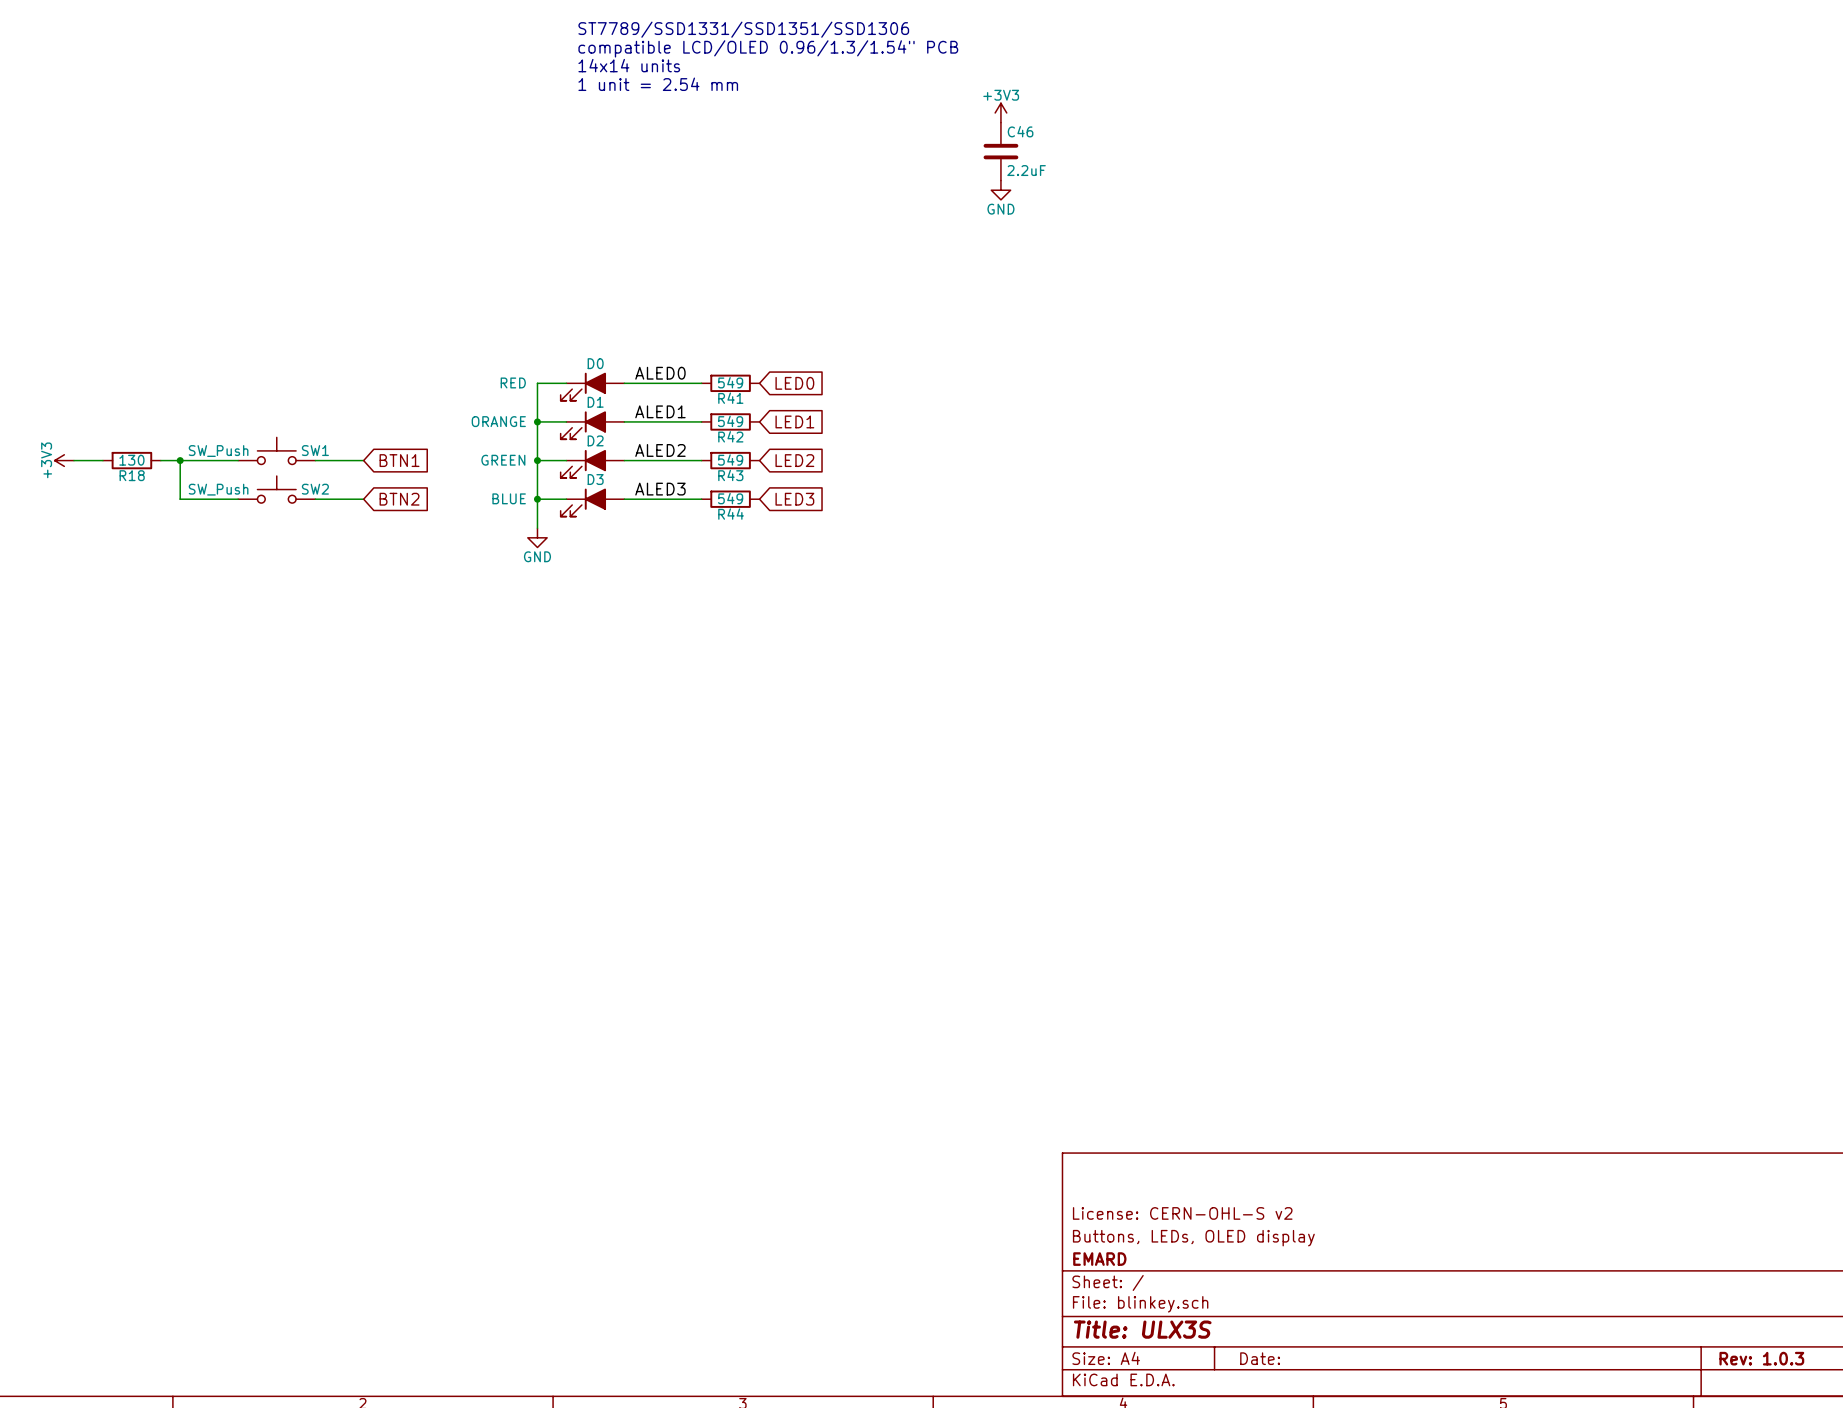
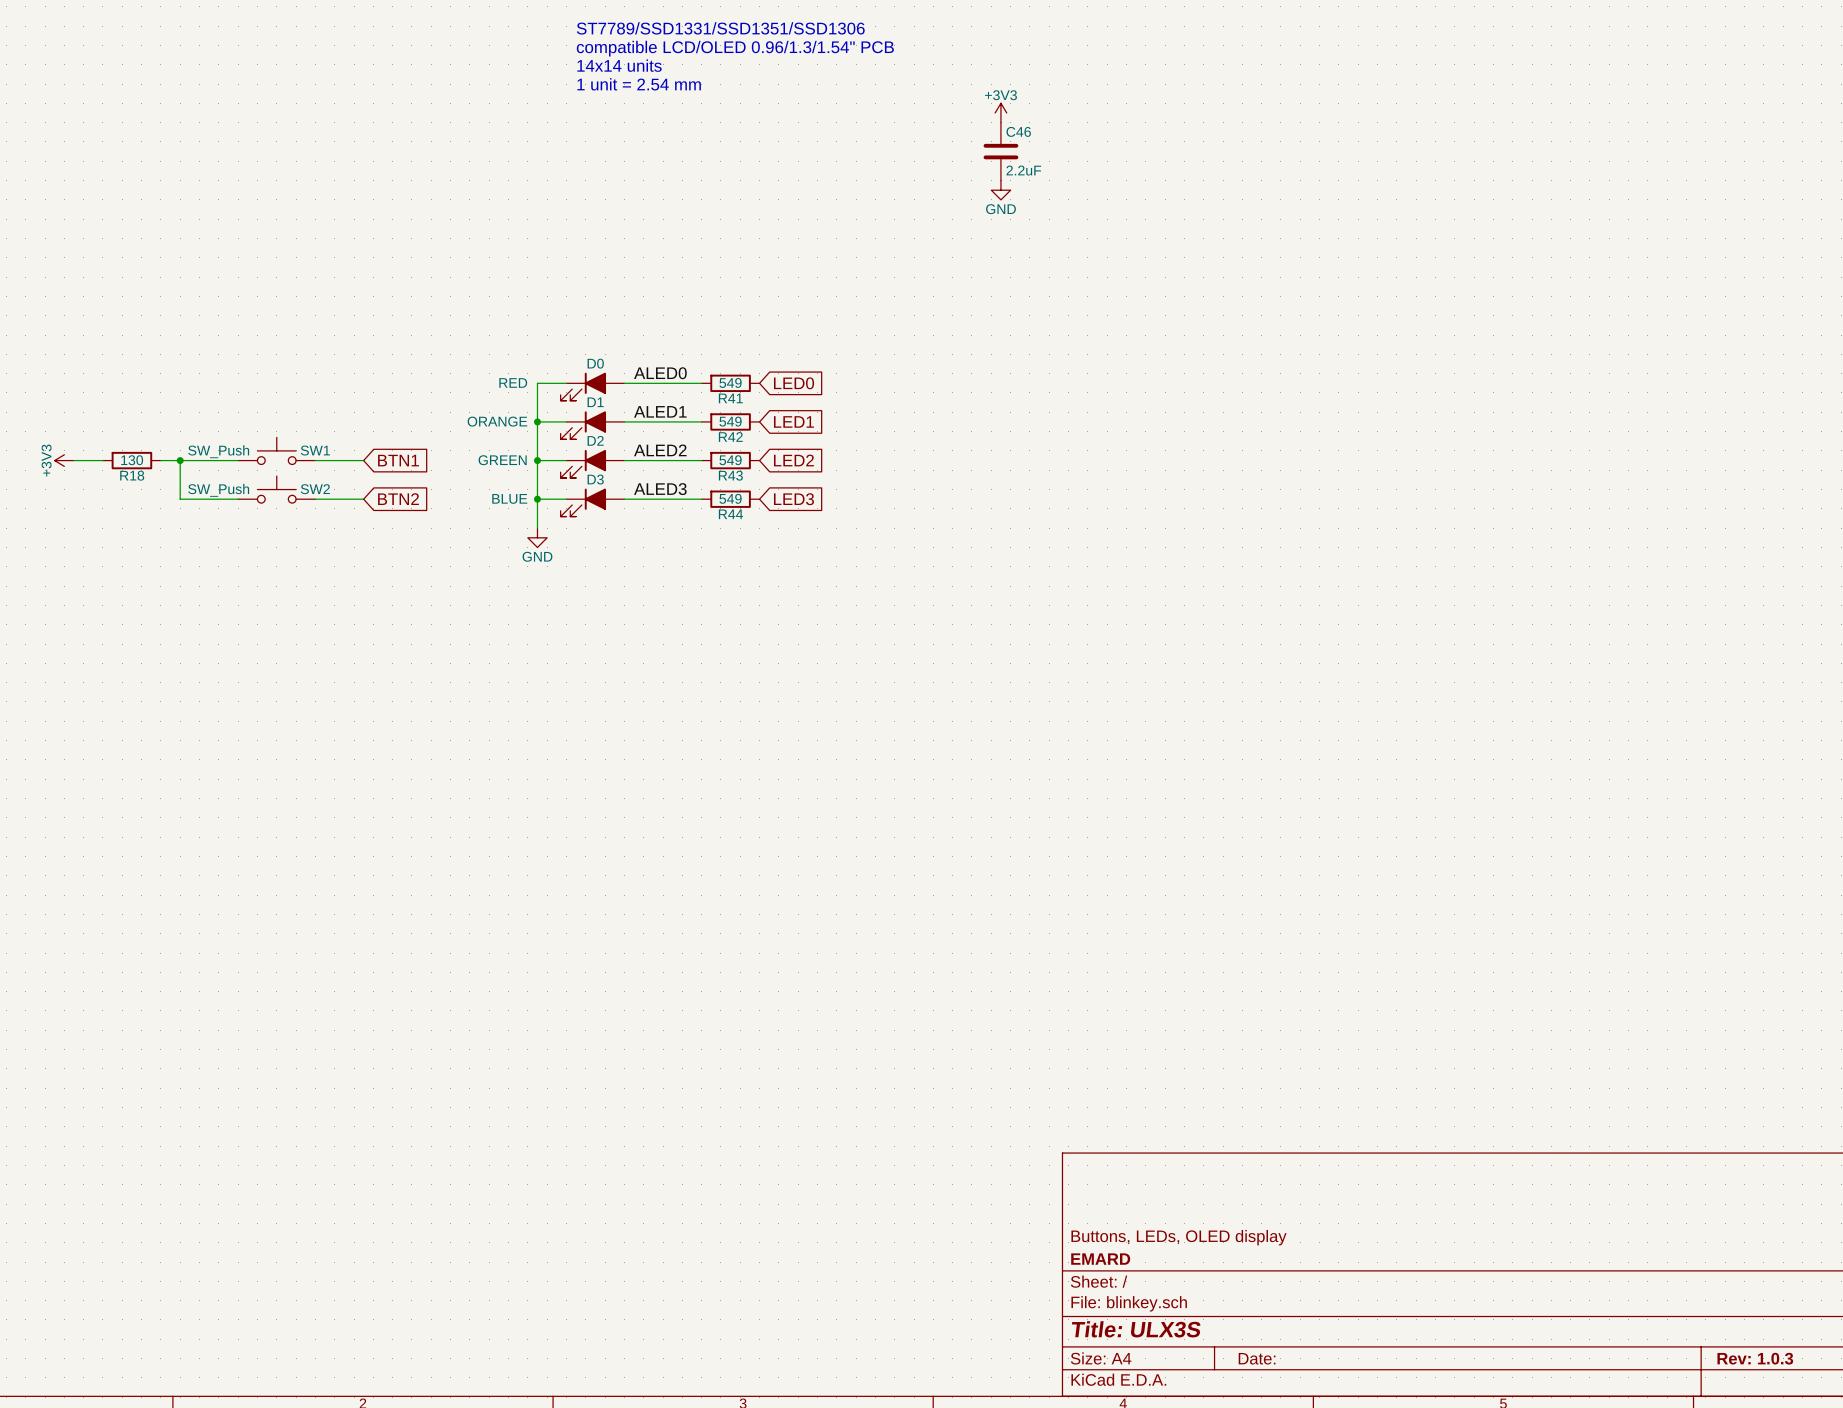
title block: License: CERN-OHL-S v2 (1182, 1213) -> none

